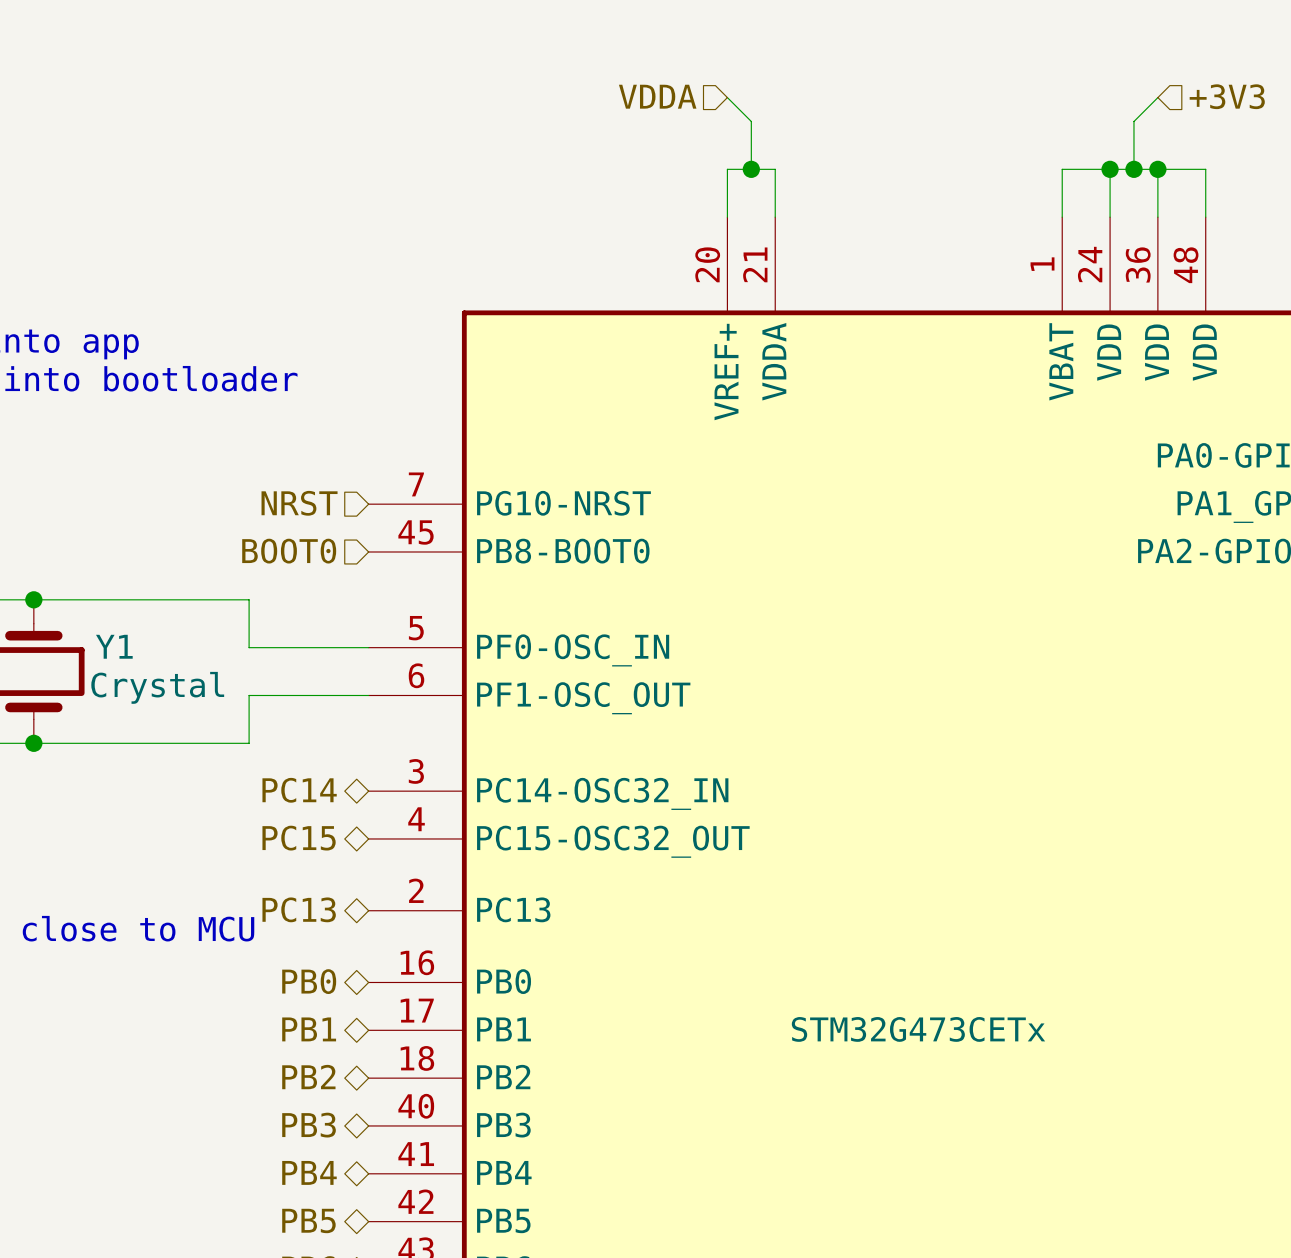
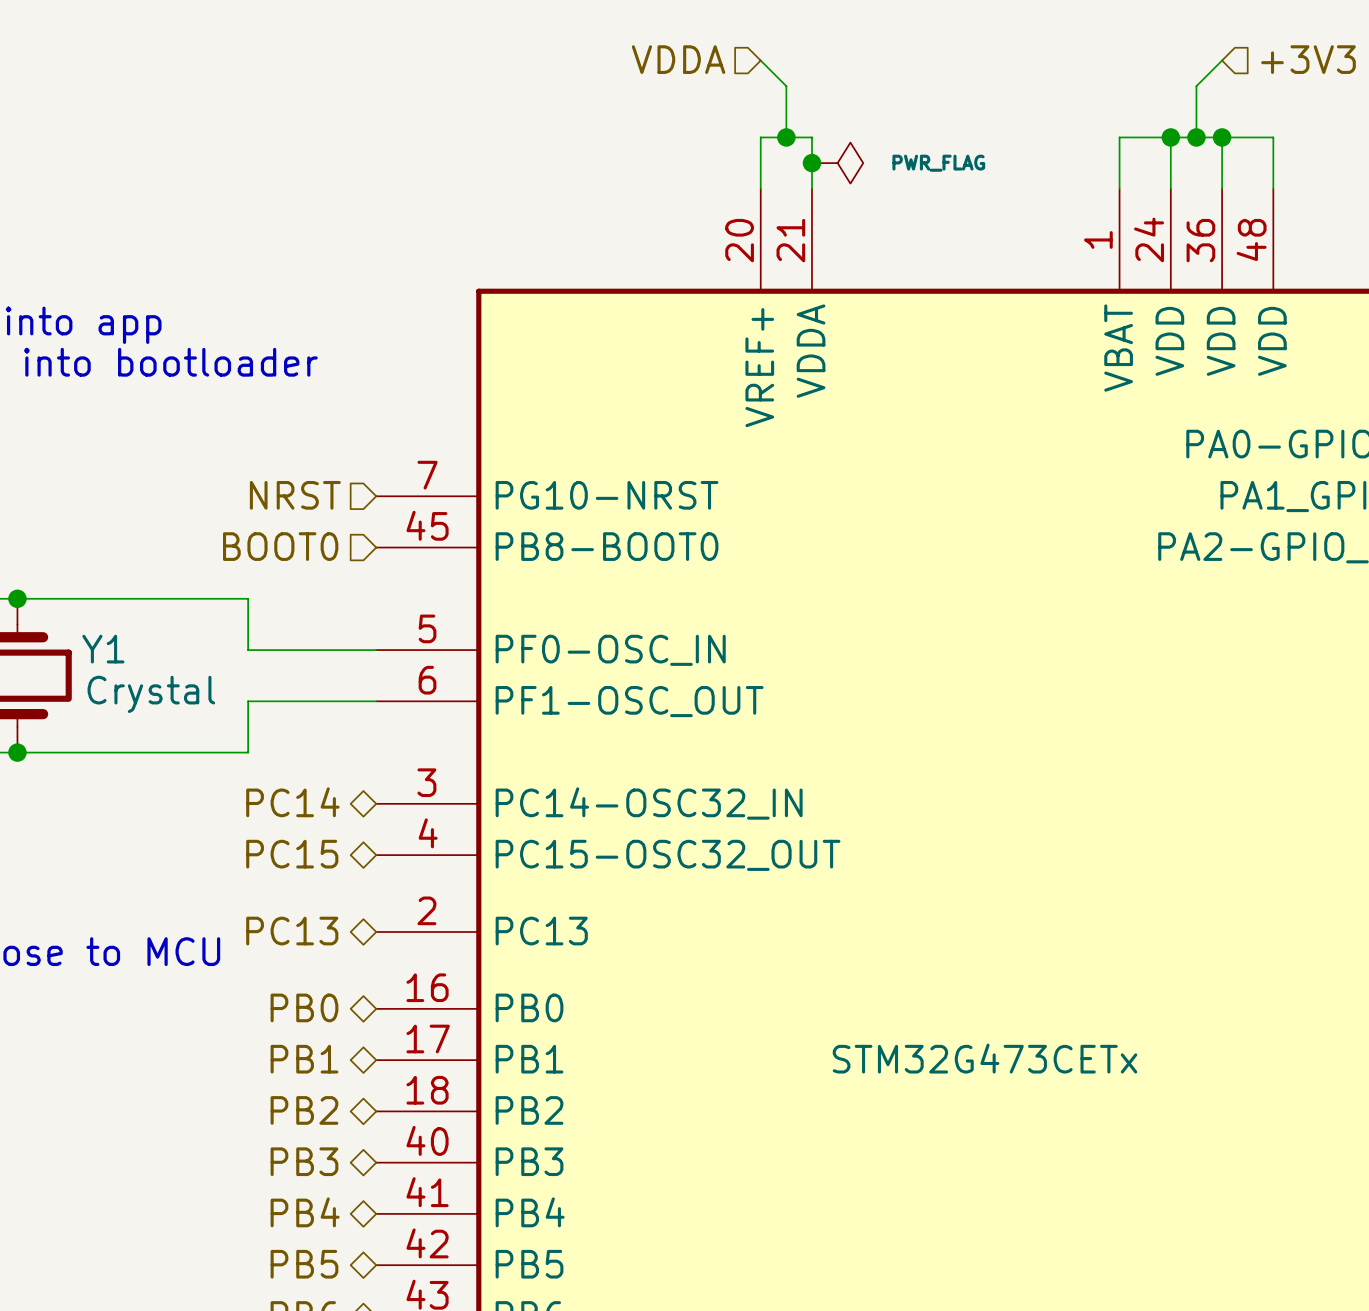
junction: none -> (811, 163)
power symbol: none -> PWR_FLAG (837, 163)

